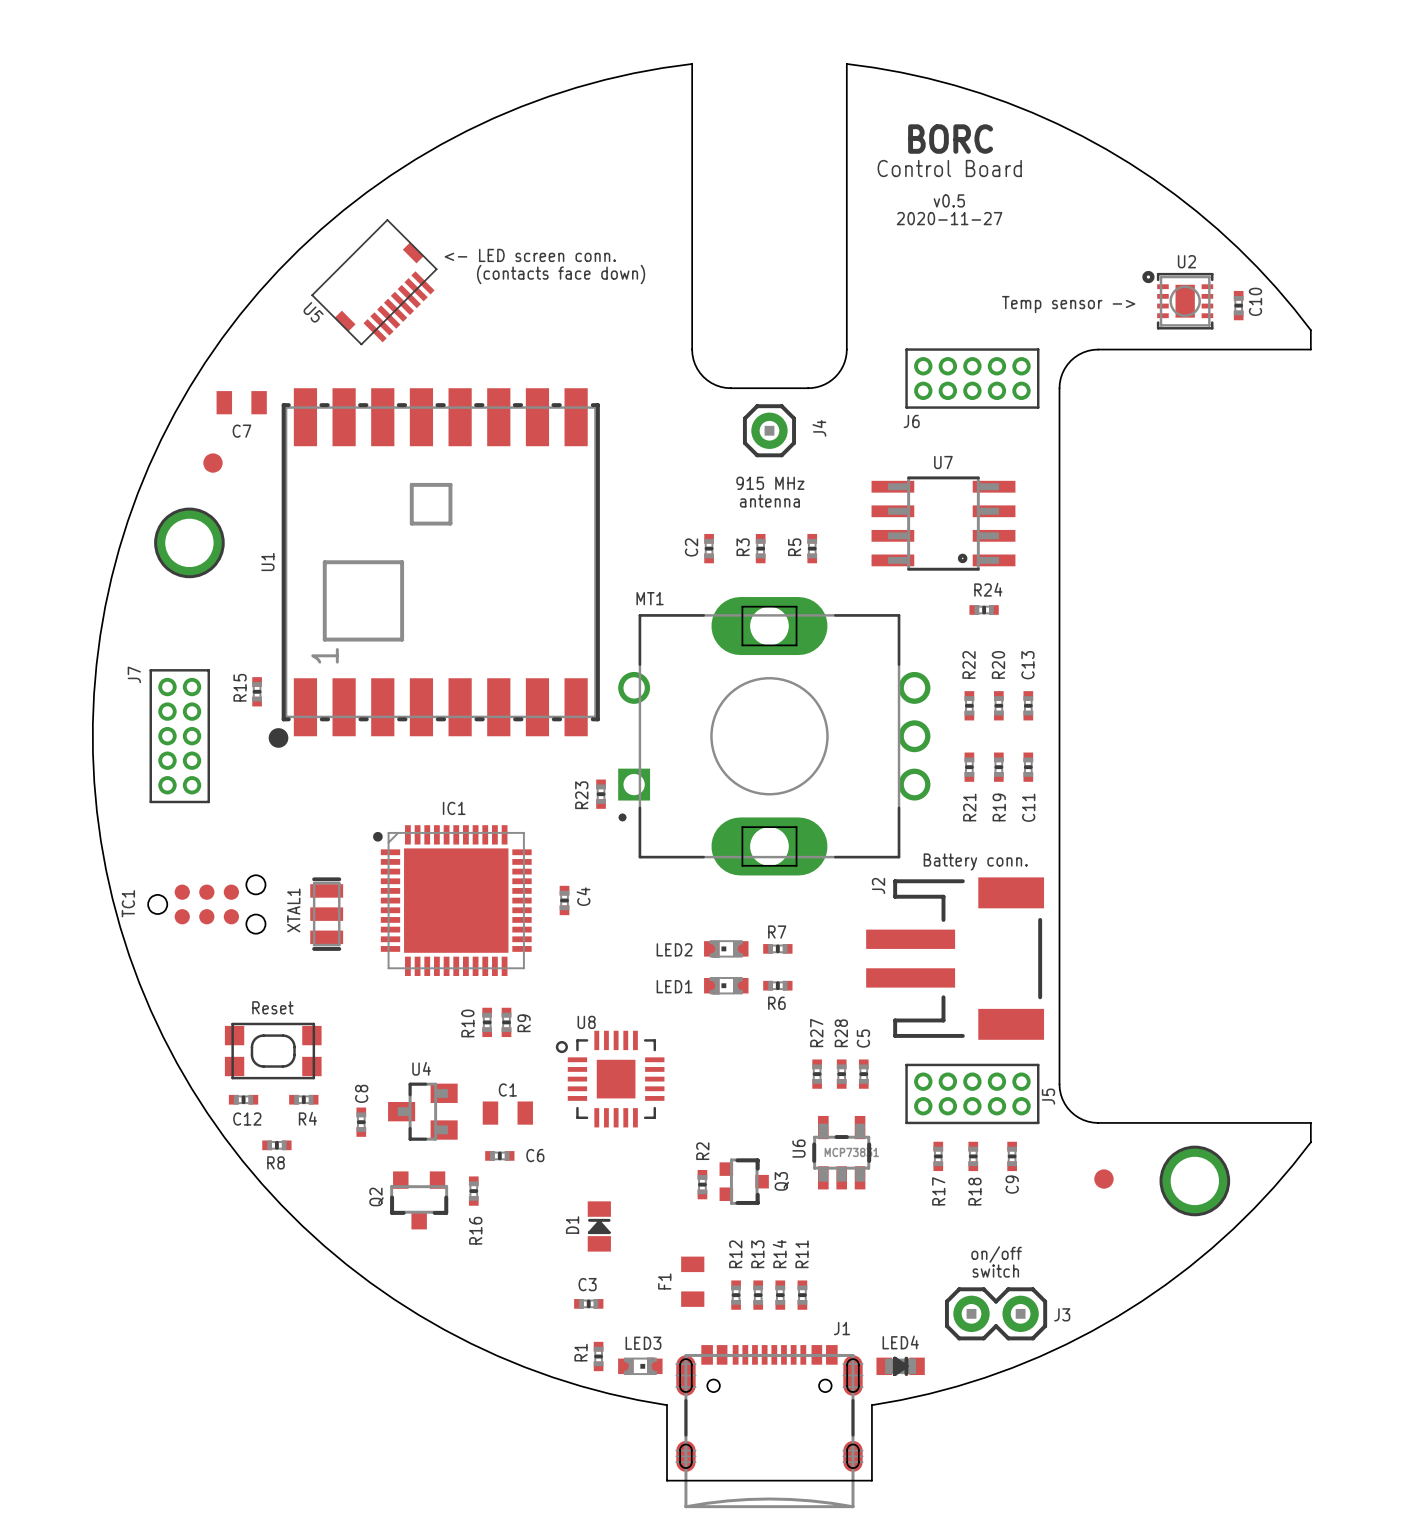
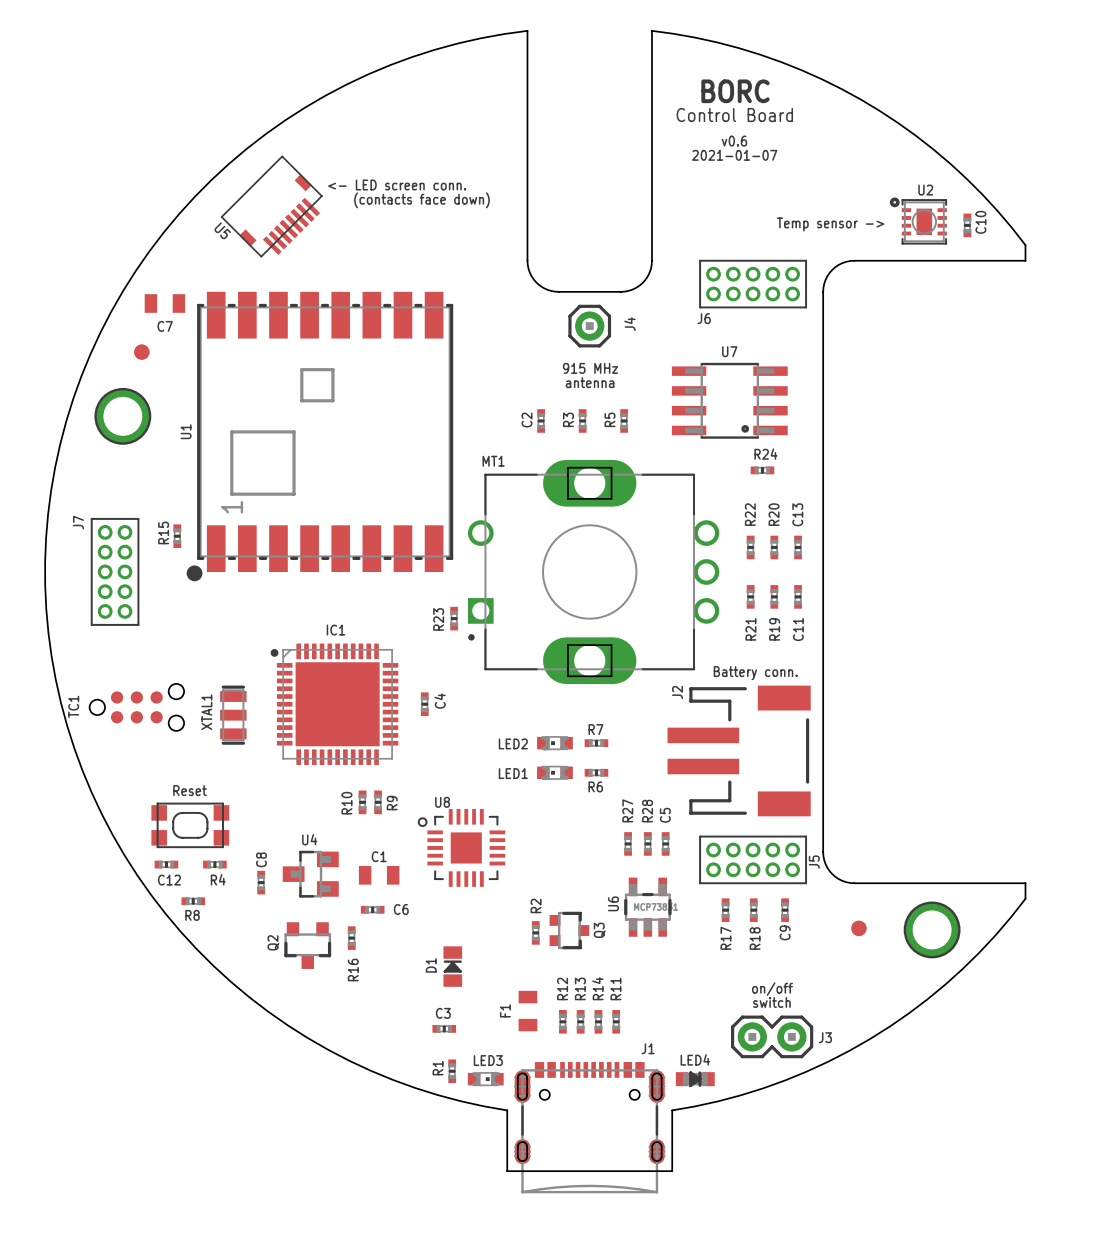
text: v0.5 (949, 200) -> v0.6 (734, 141)
text: 2020-11-27 (949, 218) -> 2021-01-07 (734, 155)

